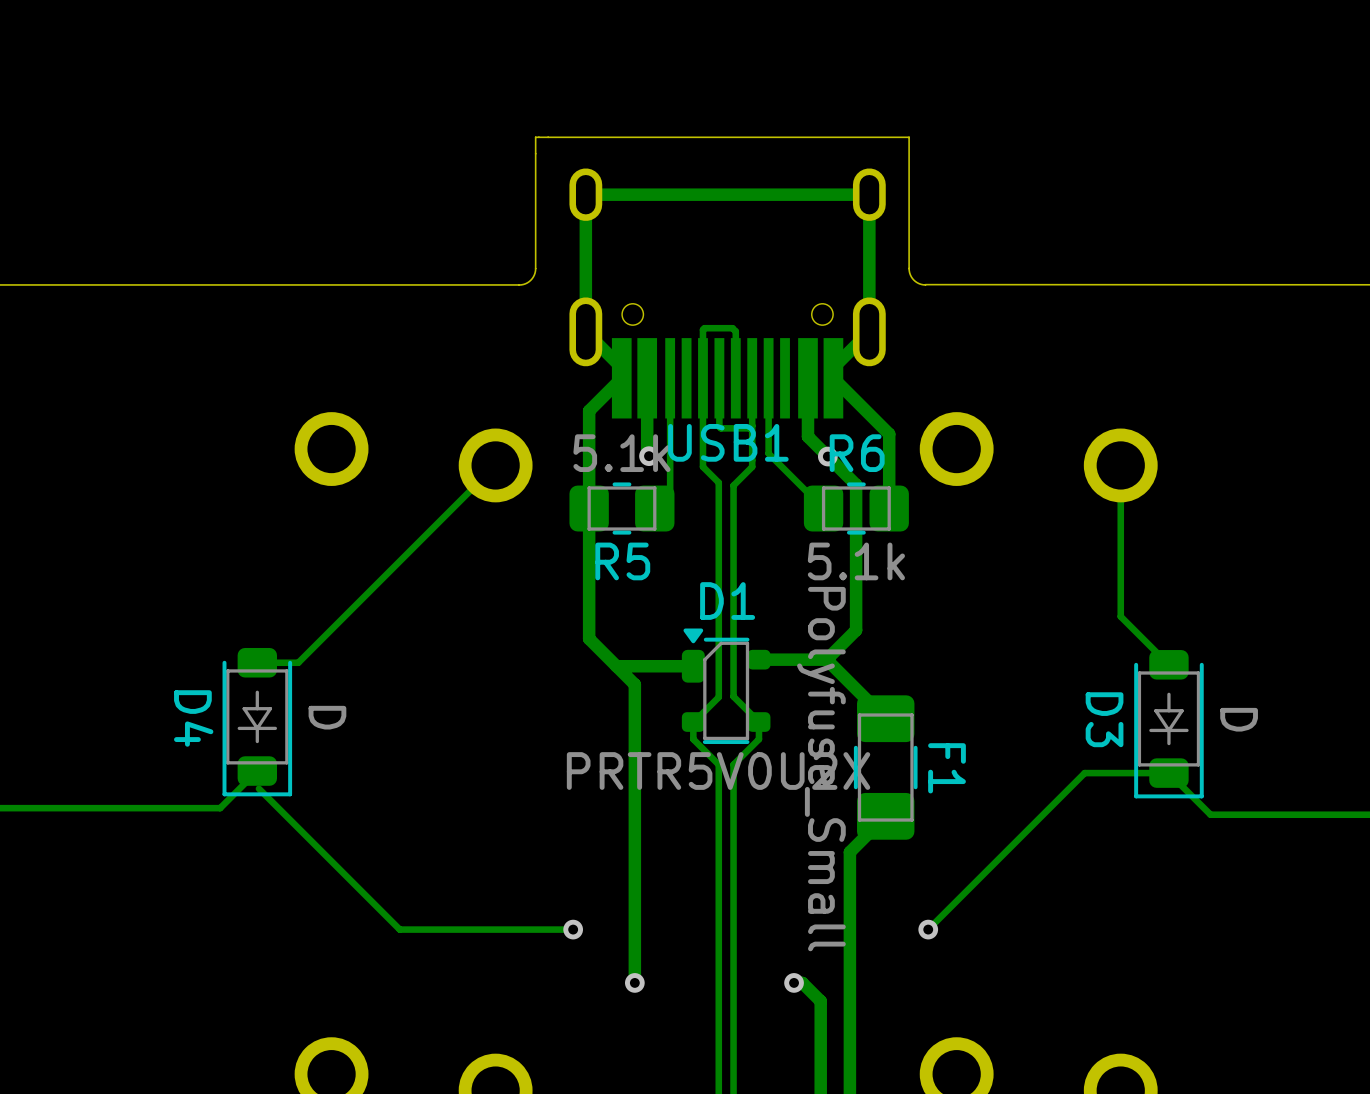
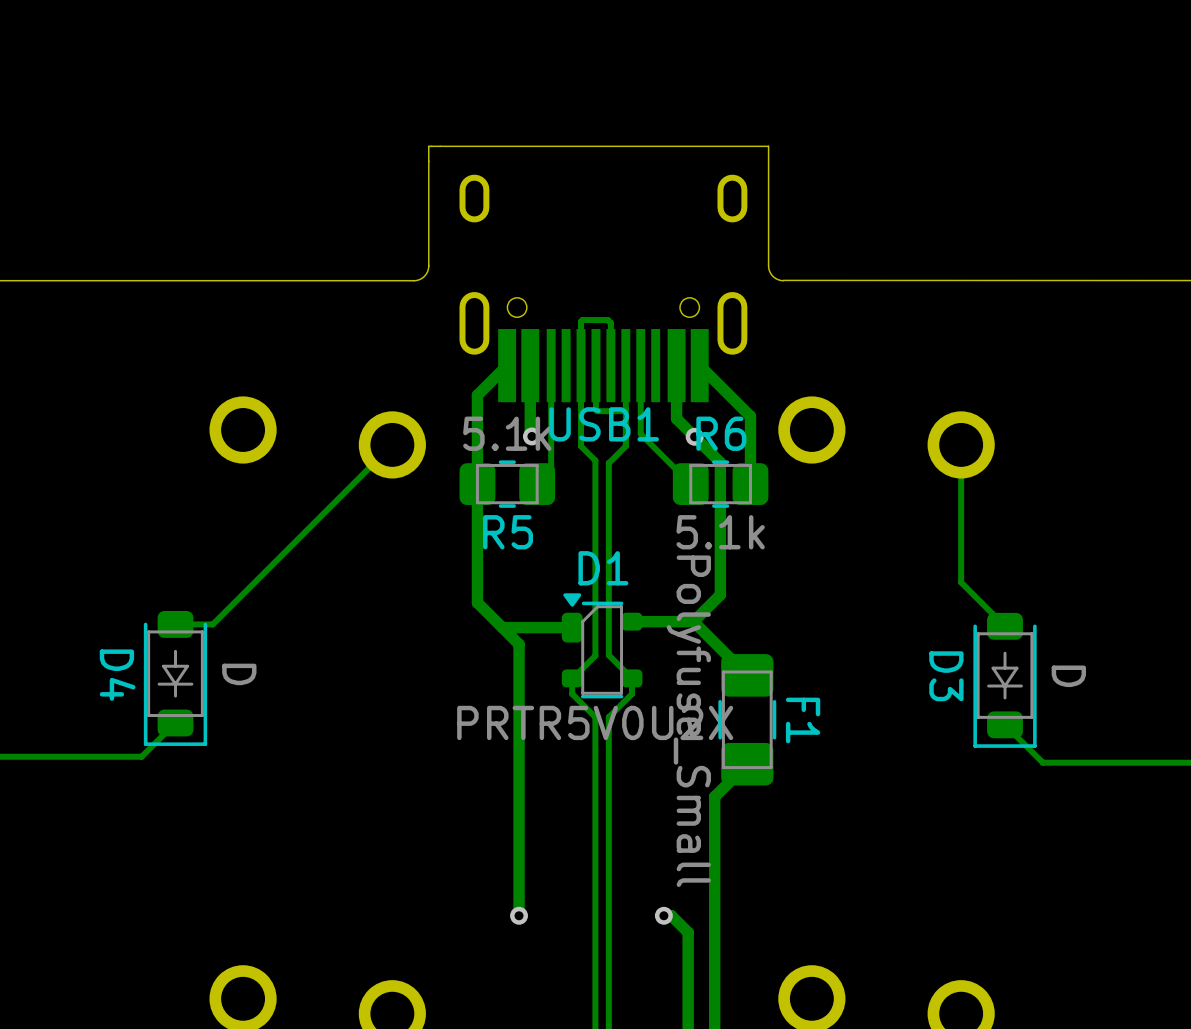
track: (833, 378) (833, 367) (869, 331) (869, 194) (585, 194) (585, 331) (621, 367) (621, 378) -> none
track: (1168, 773) (1084, 773) (928, 929) -> none
track: (258, 788) (399, 929) (573, 929) -> none
via: (573, 929) -> none
via: (928, 929) -> none

